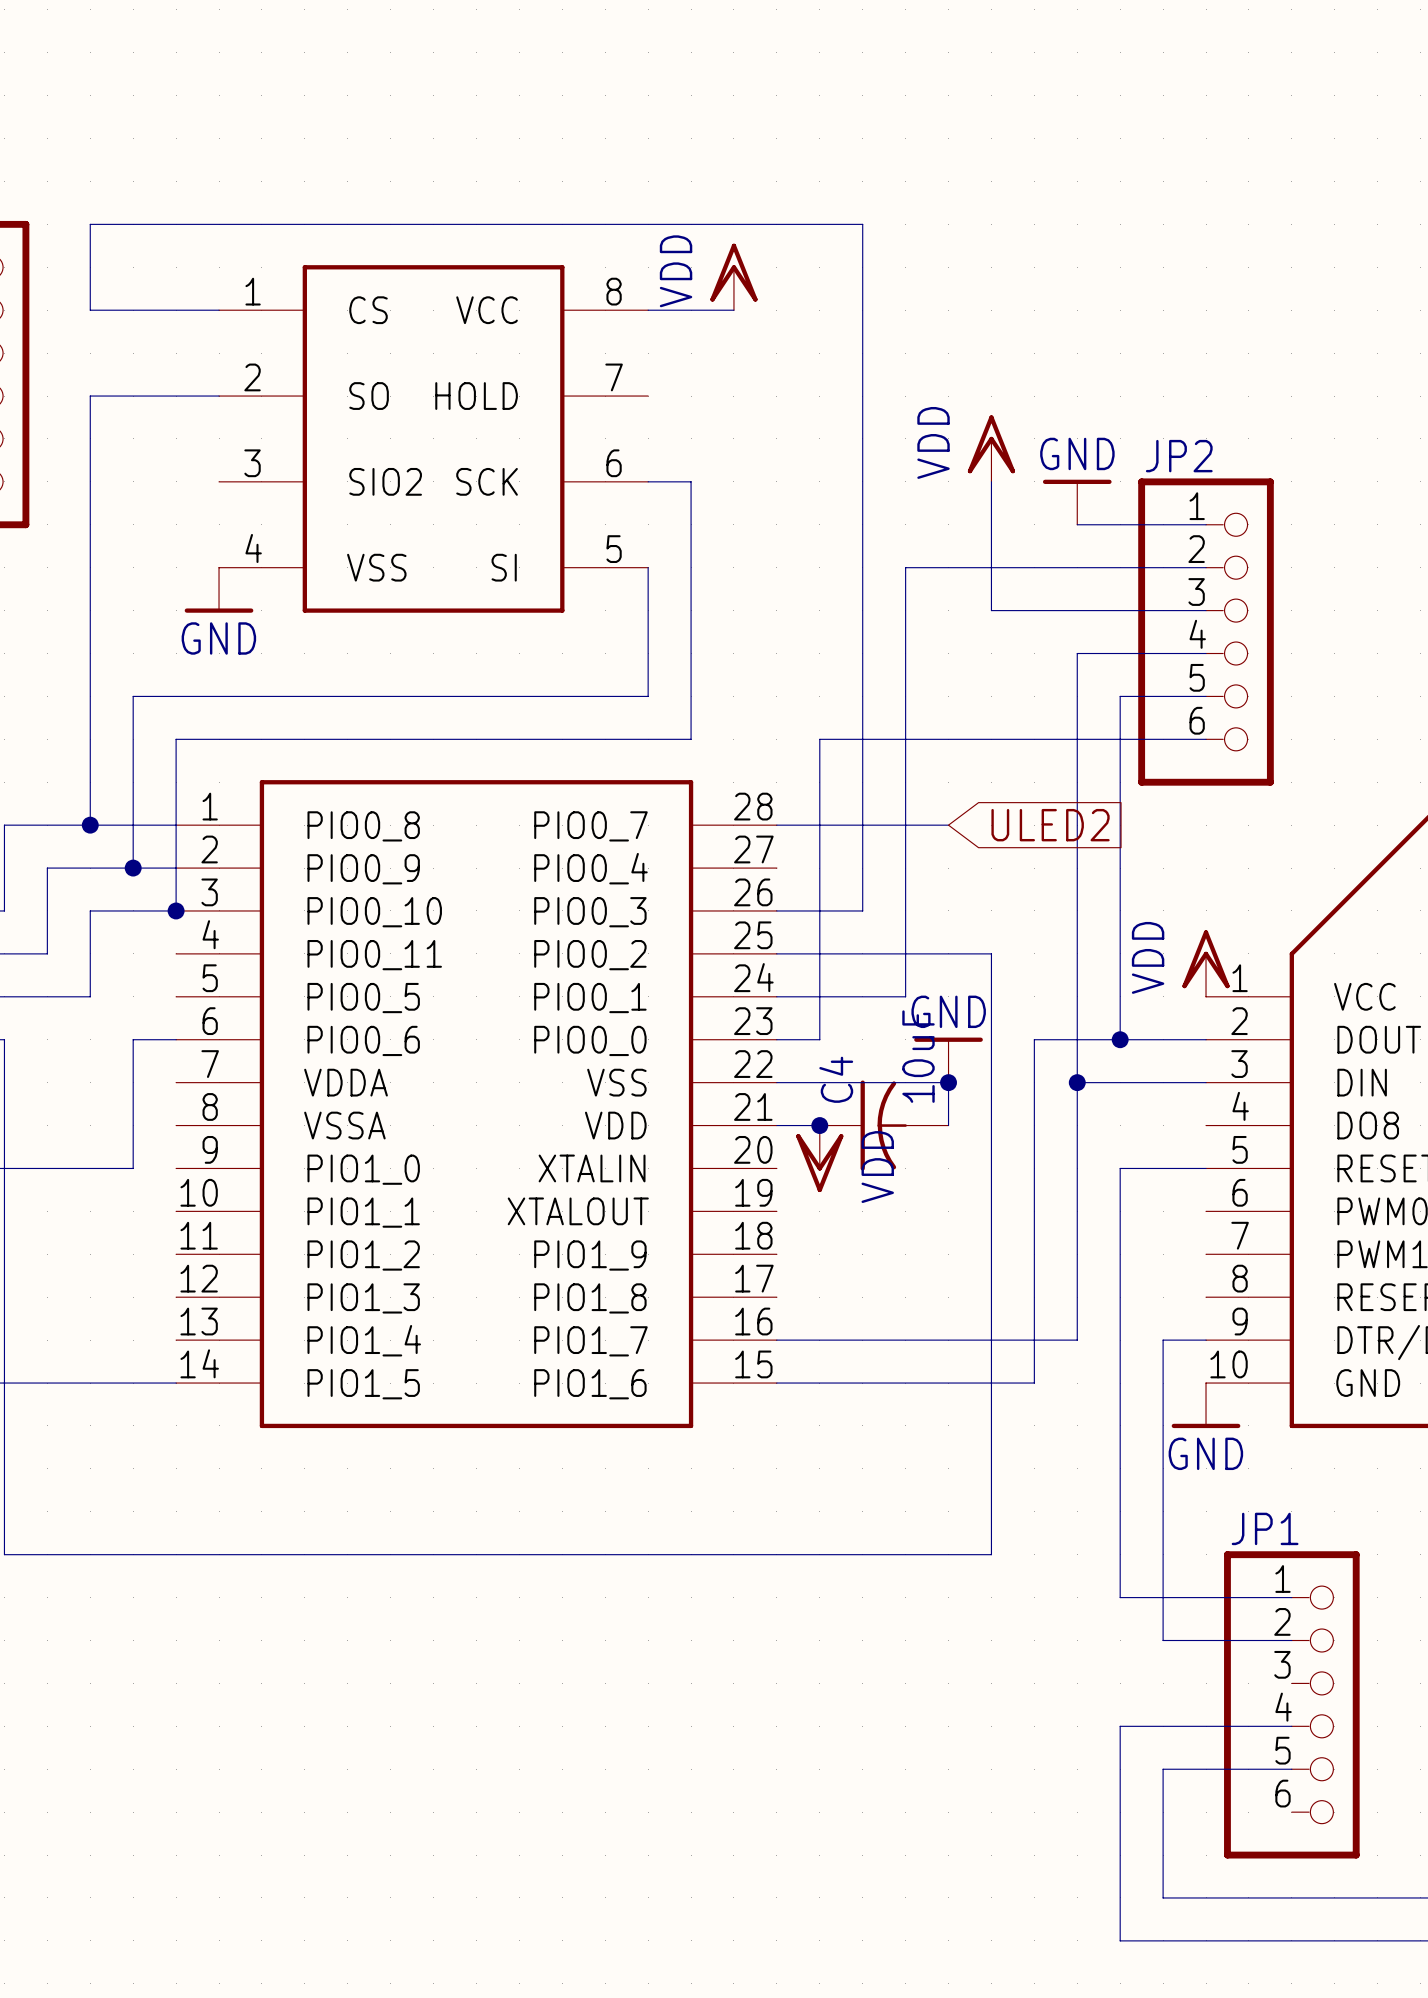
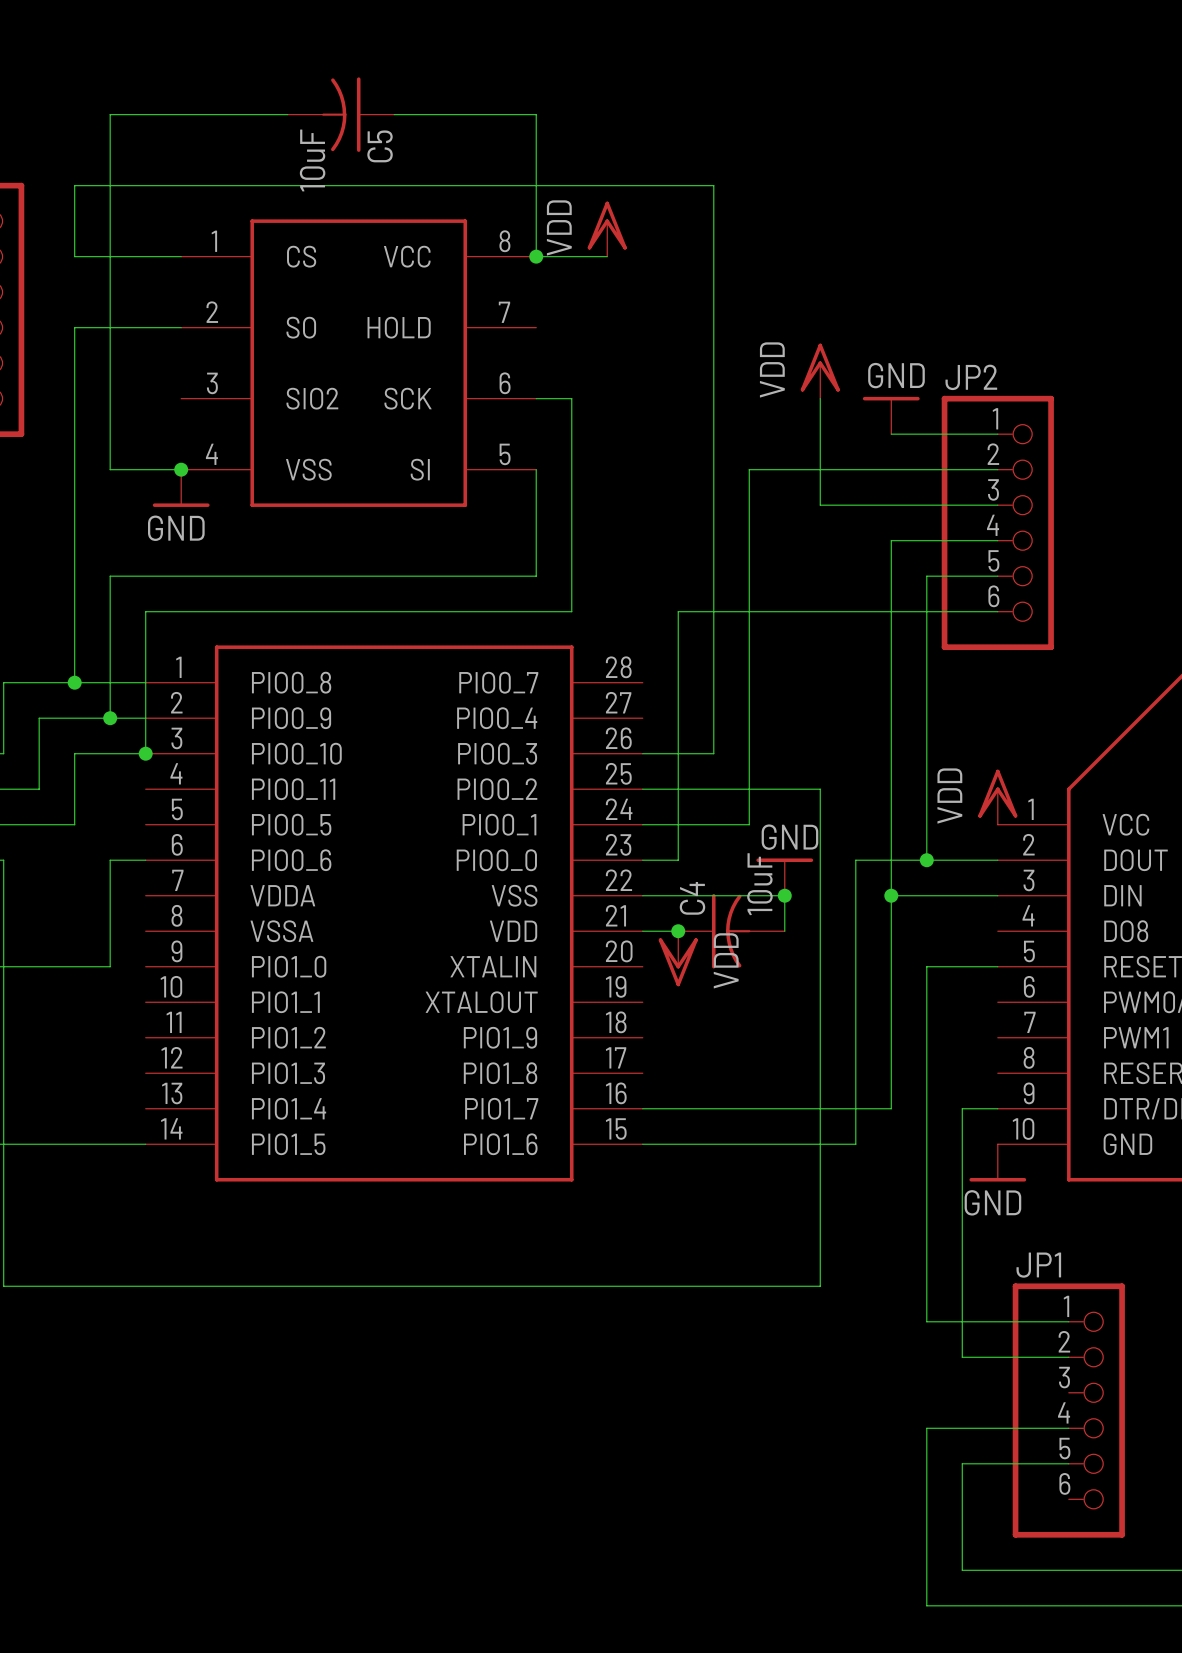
wire: none -> (287, 114) (110, 114) (110, 469) (181, 469)
C5: none -> 10uF (340, 114)
wire: none -> (394, 114) (536, 114) (536, 256)
junction: none -> (536, 256)
junction: none -> (181, 469)
wire: (776, 825) (948, 825) -> none
global label: ULED2 (1050, 825) -> none

